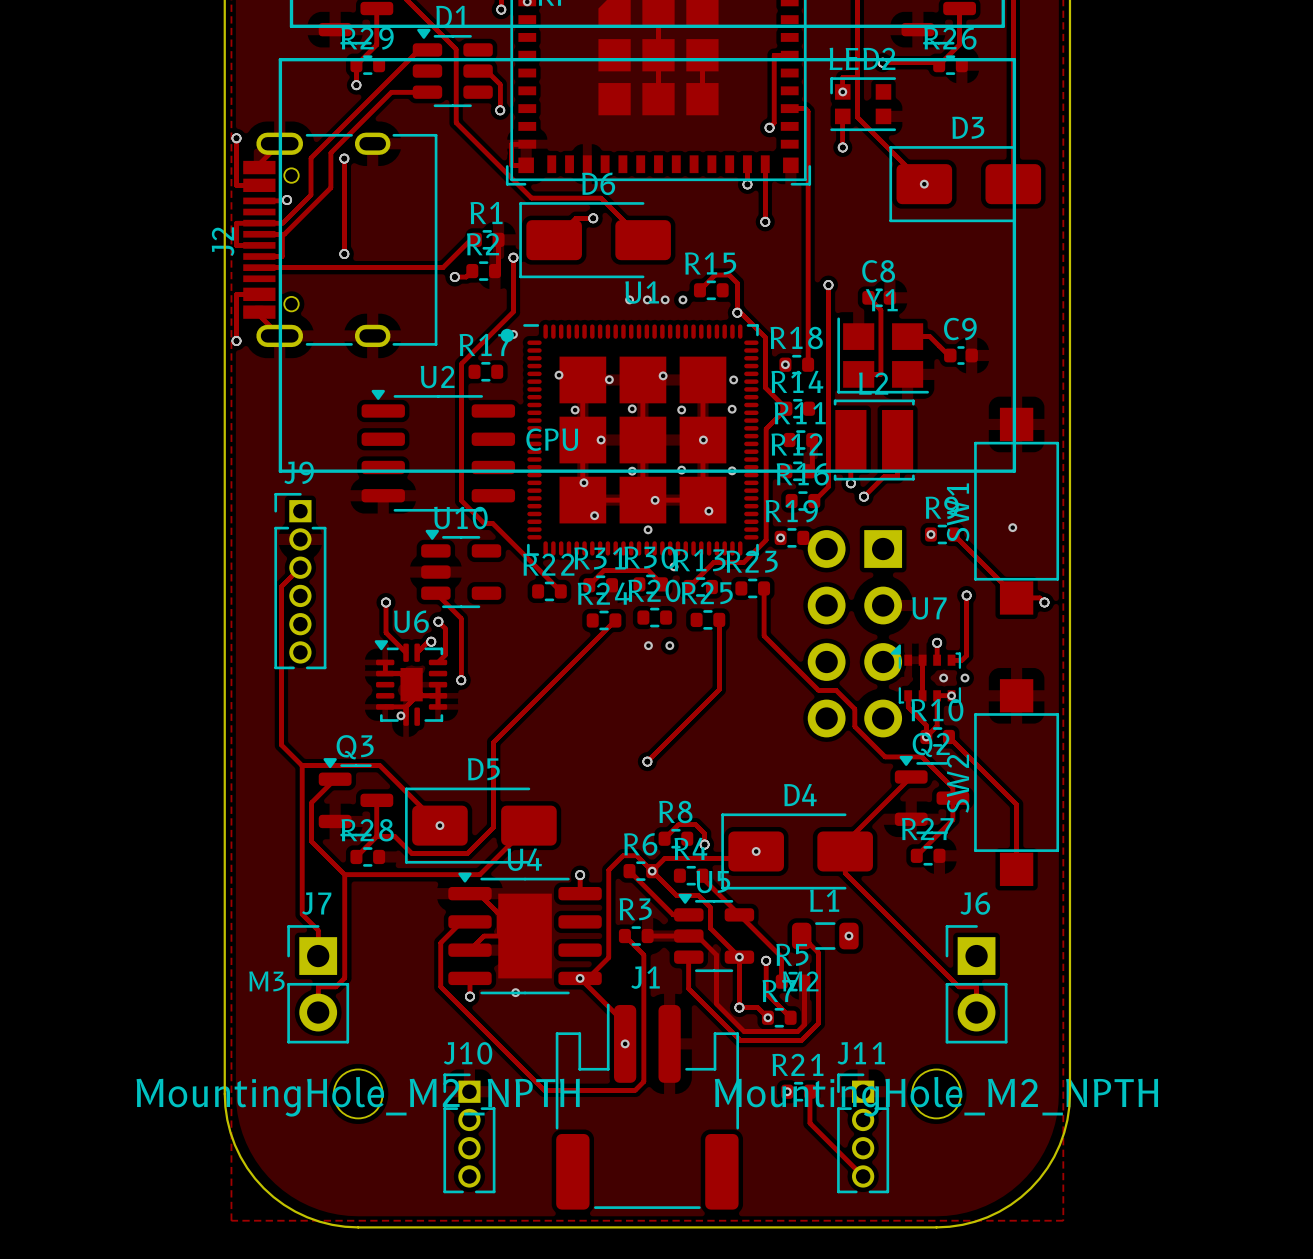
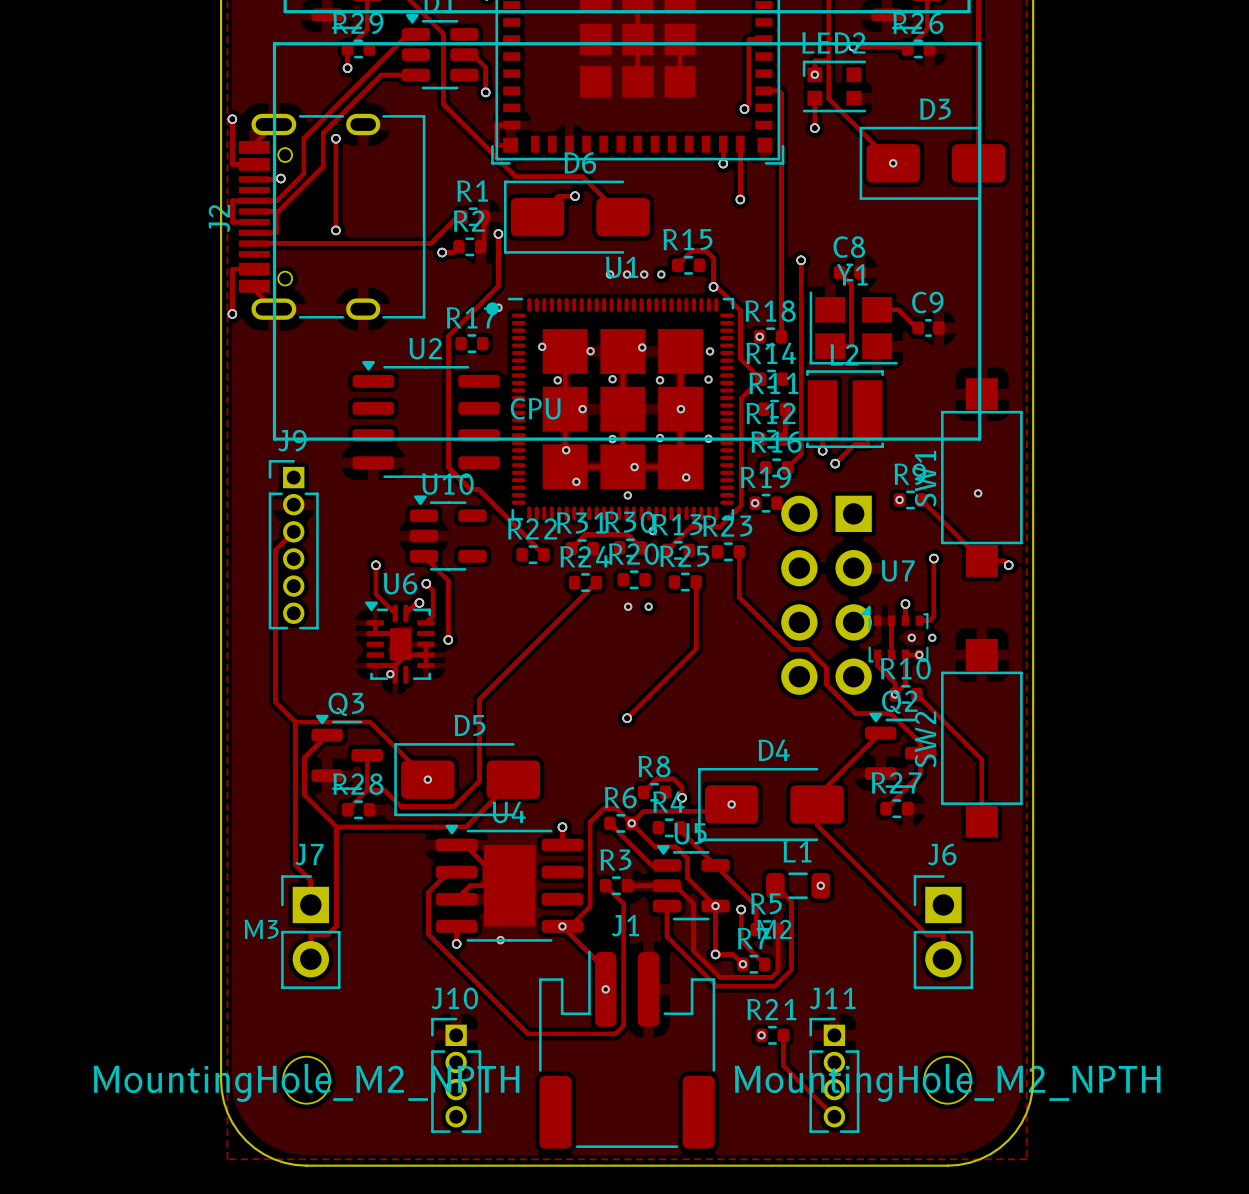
board edge: (224, 1093) (227, 1119) (234, 1145) (247, 1168) (263, 1188) (284, 1204) (307, 1217) (332, 1224) (358, 1227) -> (221, 1037) (221, 1080) (223, 1102) (232, 1122) (246, 1140) (263, 1154) (284, 1162) (306, 1165) (349, 1165)
part position: (358, 1093) -> (306, 1080)
part position: (936, 1093) -> (947, 1080)
board edge: (1069, 1093) (1067, 1119) (1059, 1145) (1047, 1168) (1030, 1188) (1010, 1204) (987, 1217) (962, 1224) (936, 1227) -> (1033, 1037) (1033, 1080) (1030, 1102) (1021, 1122) (1008, 1140) (990, 1154) (969, 1162) (947, 1165) (904, 1165)

